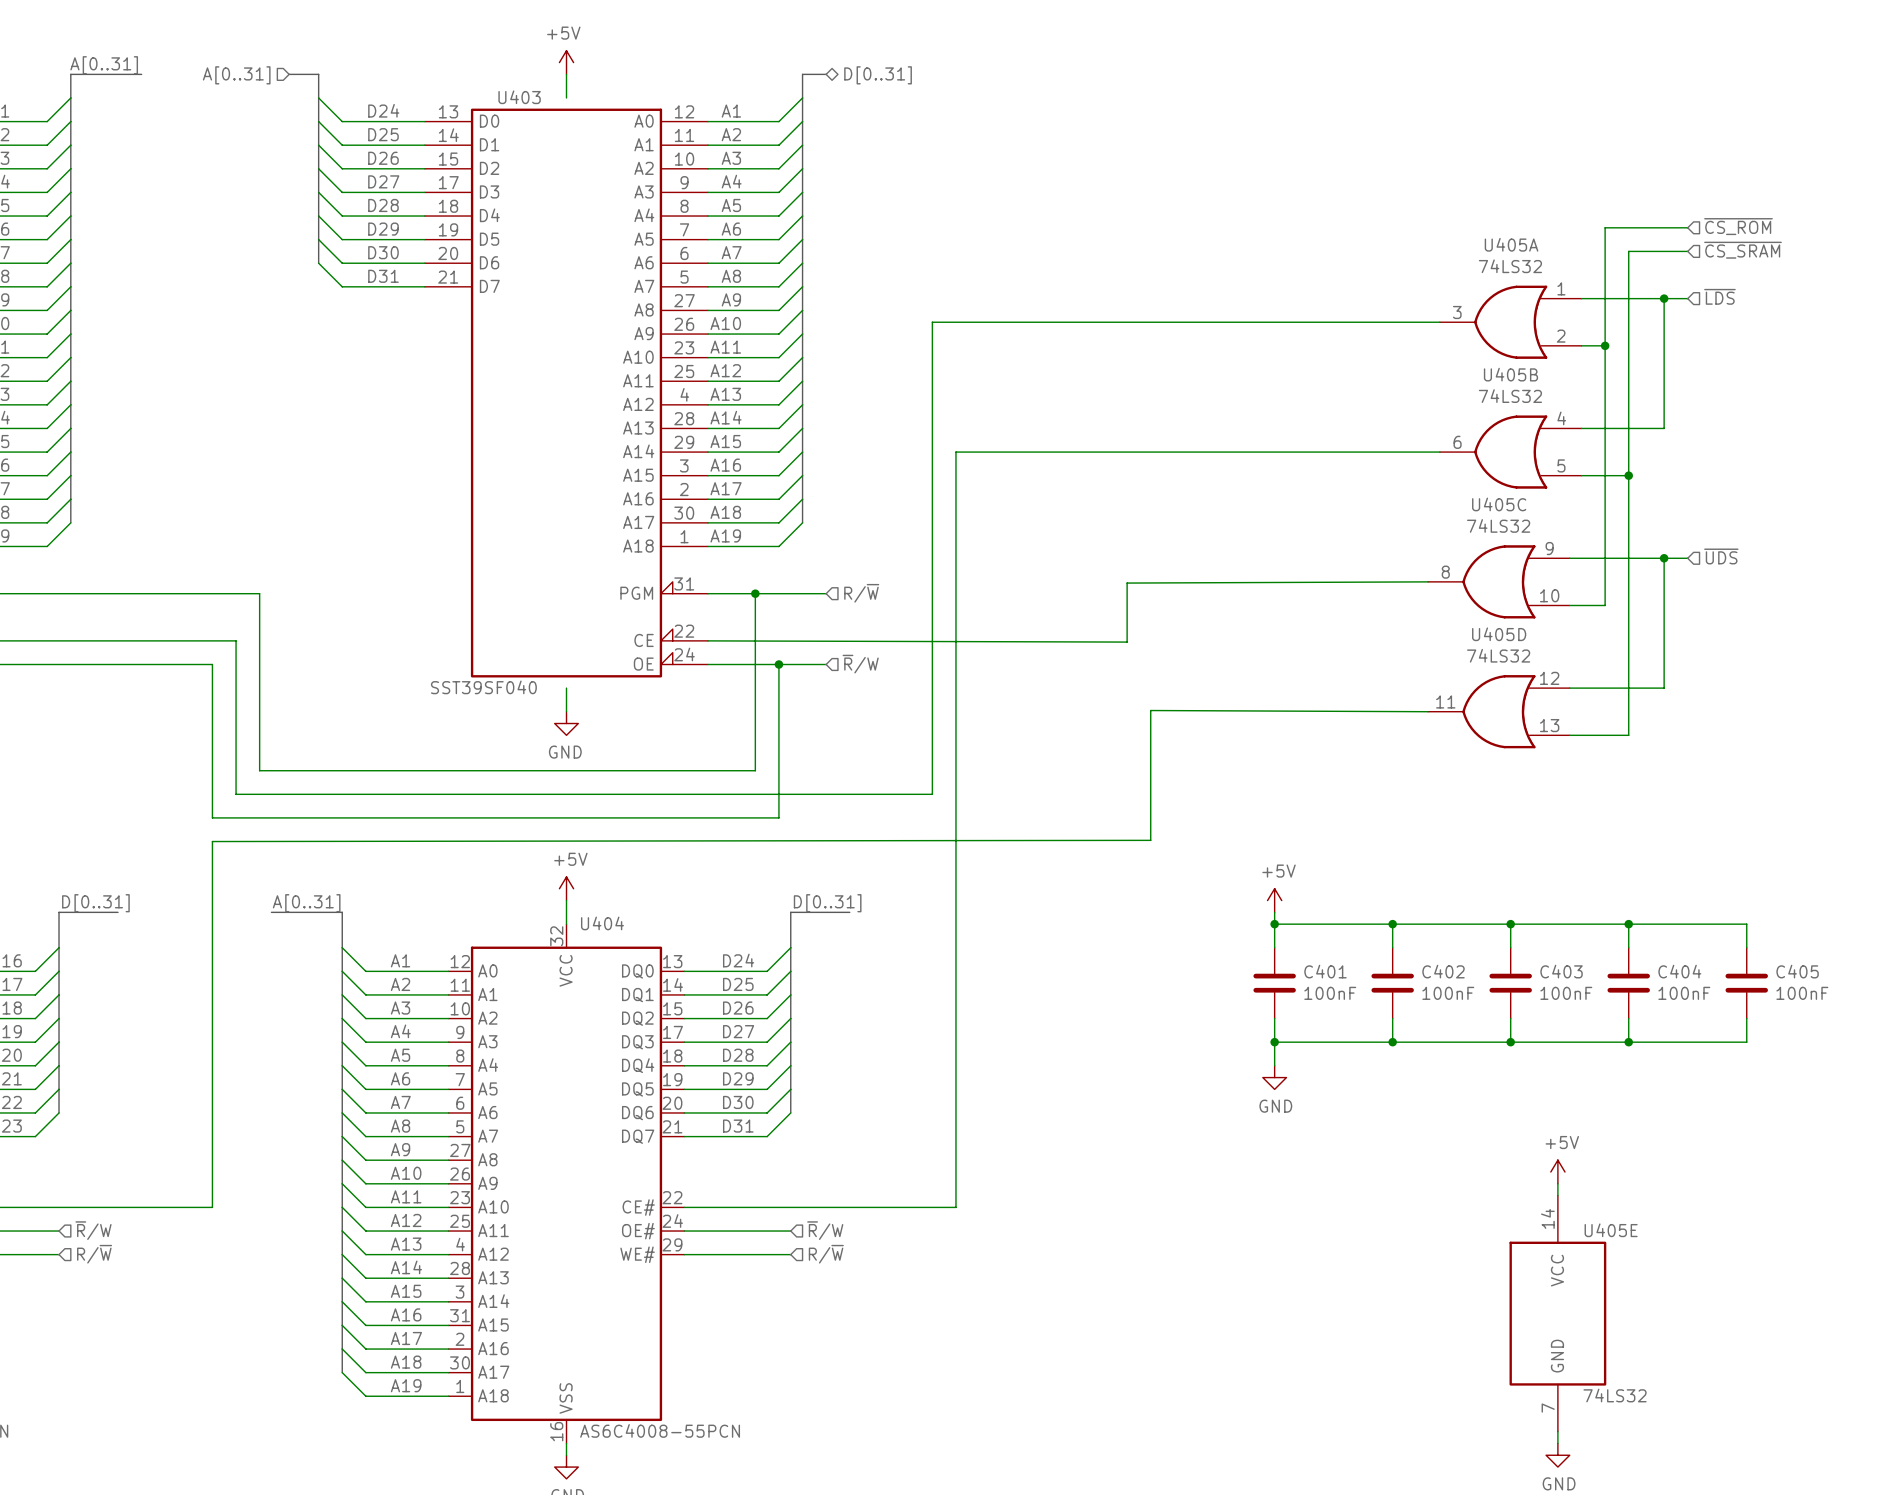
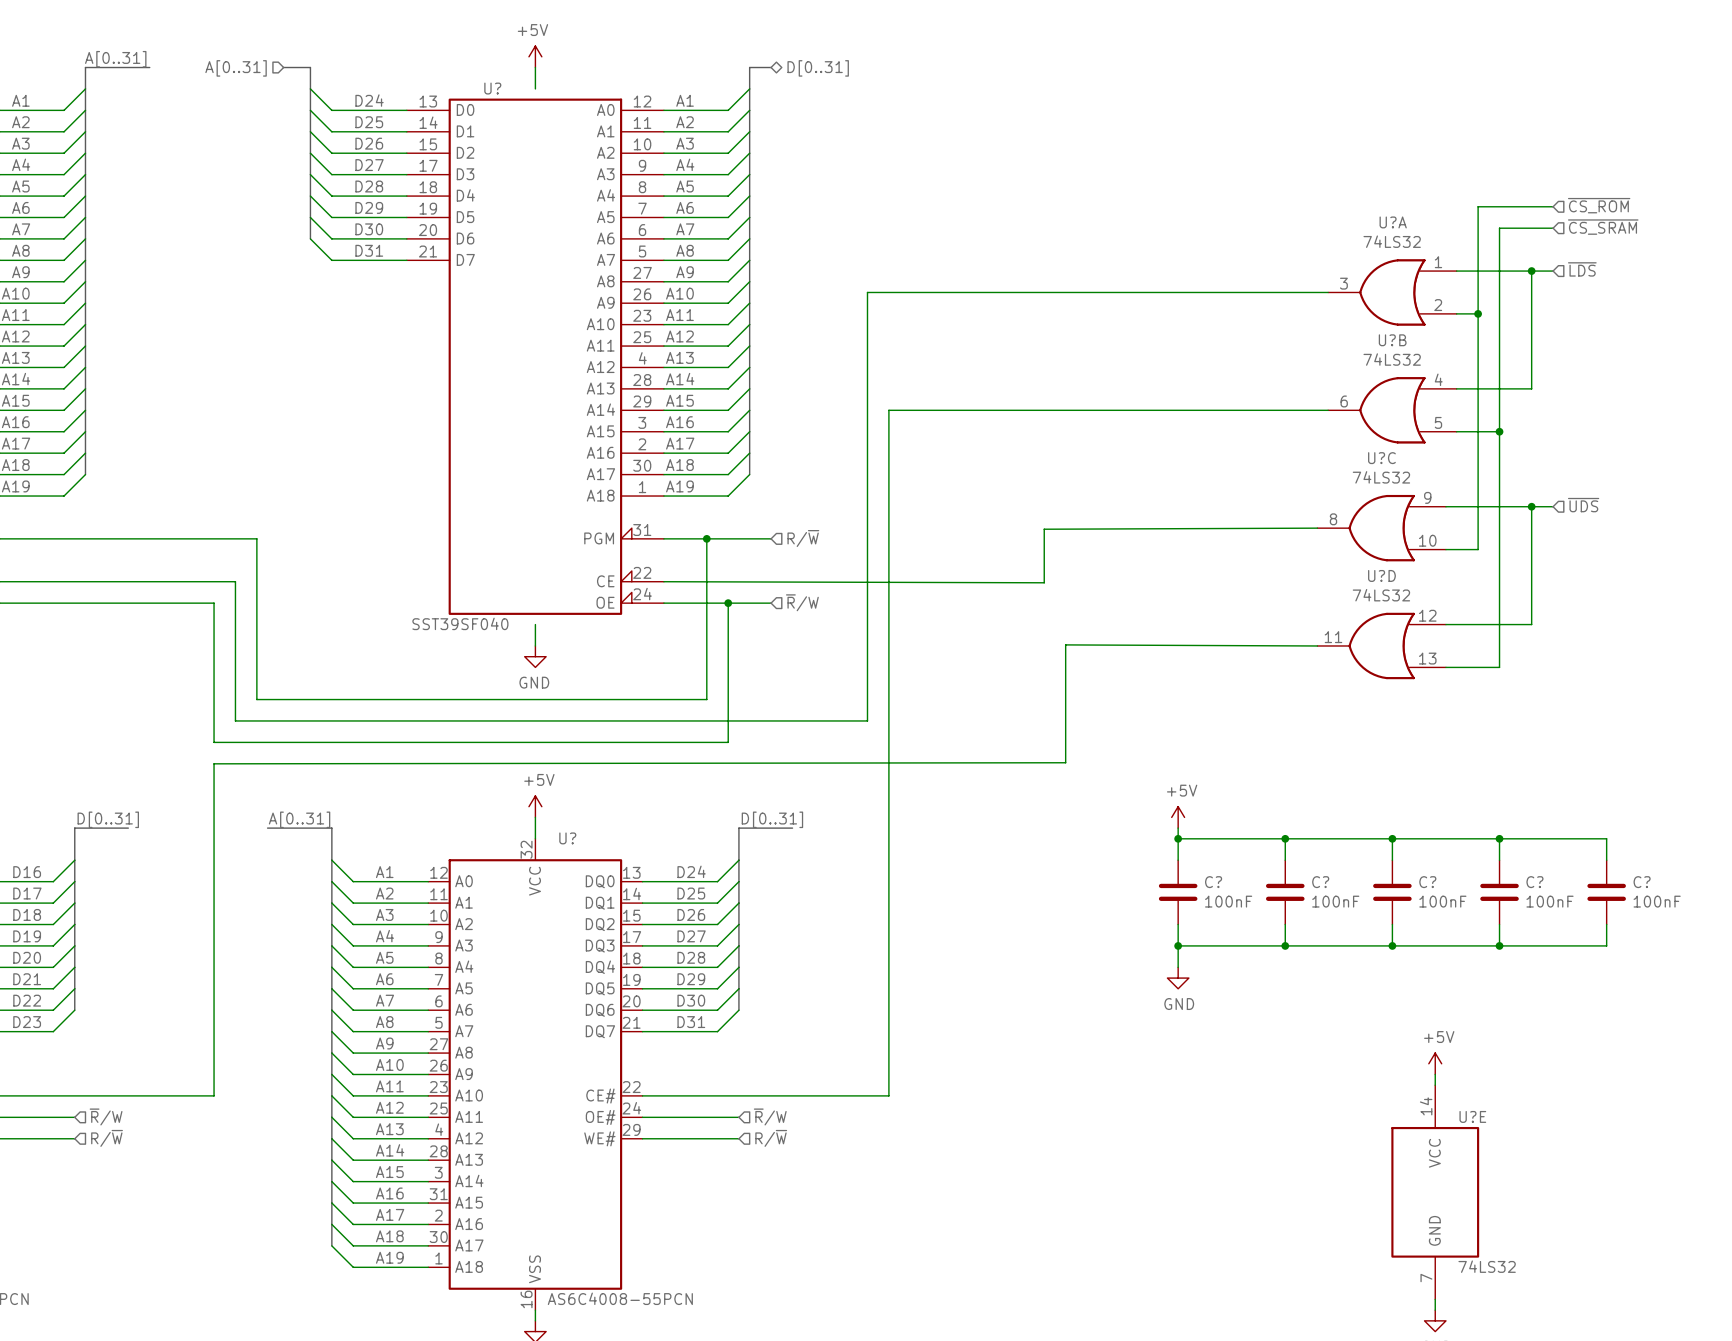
U403 name: U403 (519, 97) -> U? (492, 88)
U405A name: U405A (1511, 244) -> U?A (1393, 222)
U405B name: U405B (1510, 374) -> U?B (1392, 340)
U405C name: U405C (1499, 504) -> U?C (1381, 458)
U405D name: U405D (1499, 634) -> U?D (1381, 575)
U404 name: U404 (602, 923) -> U? (567, 838)
C401 name: C401 (1325, 971) -> C? (1213, 882)
C402 name: C402 (1443, 971) -> C? (1320, 882)
C403 name: C403 (1561, 971) -> C? (1427, 882)
C404 name: C404 (1679, 971) -> C? (1534, 882)
C405 name: C405 (1797, 971) -> C? (1642, 882)
U405E name: U405E (1611, 1230) -> U?E (1472, 1116)

